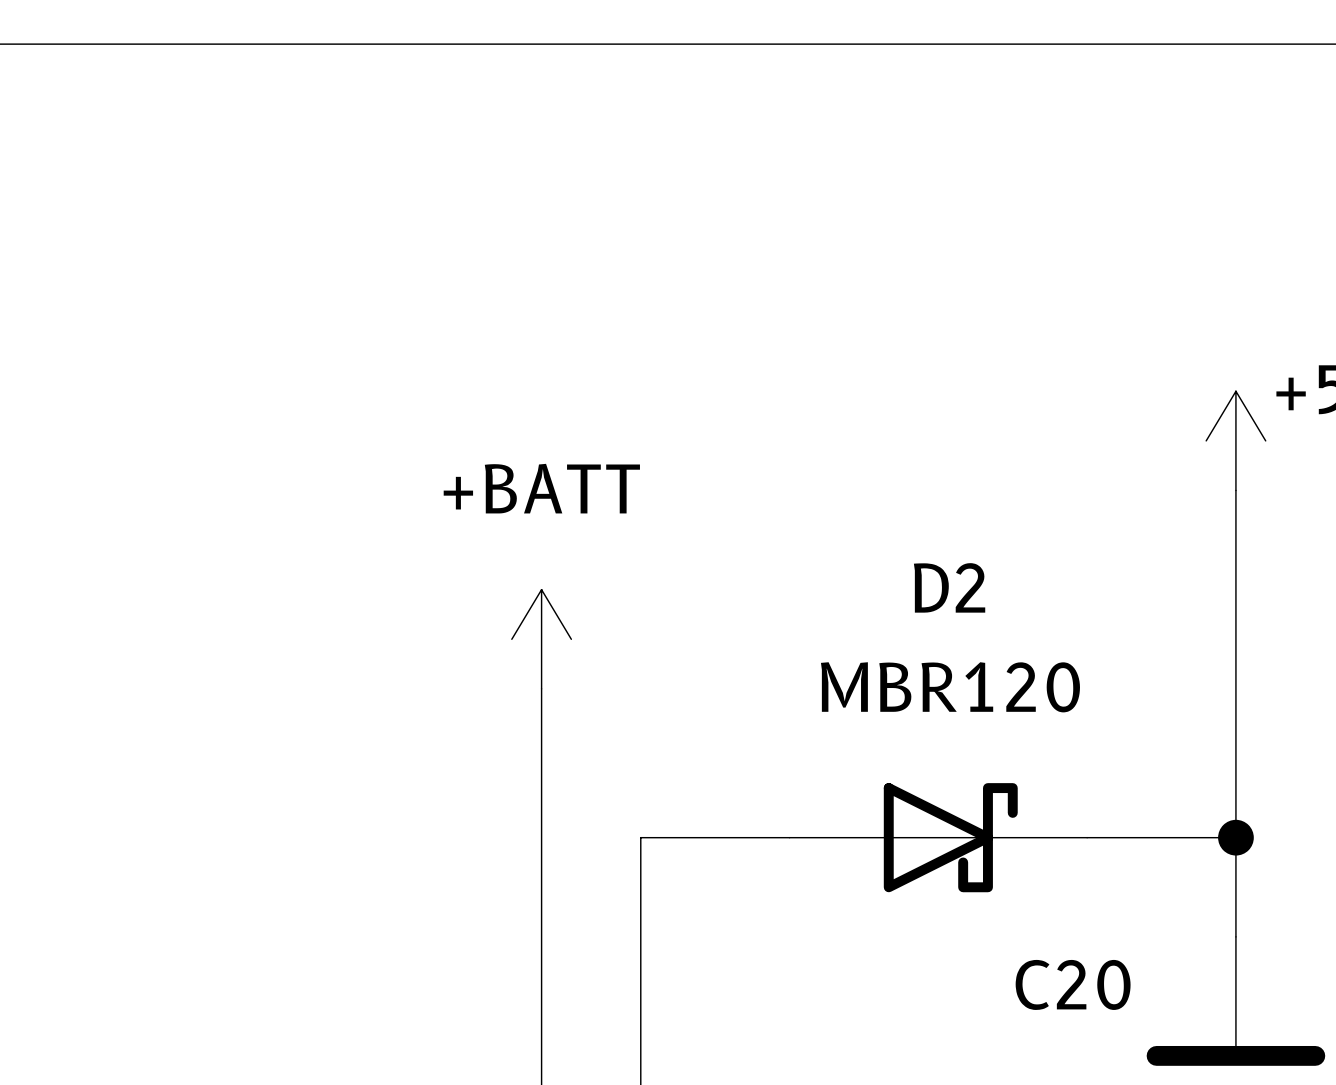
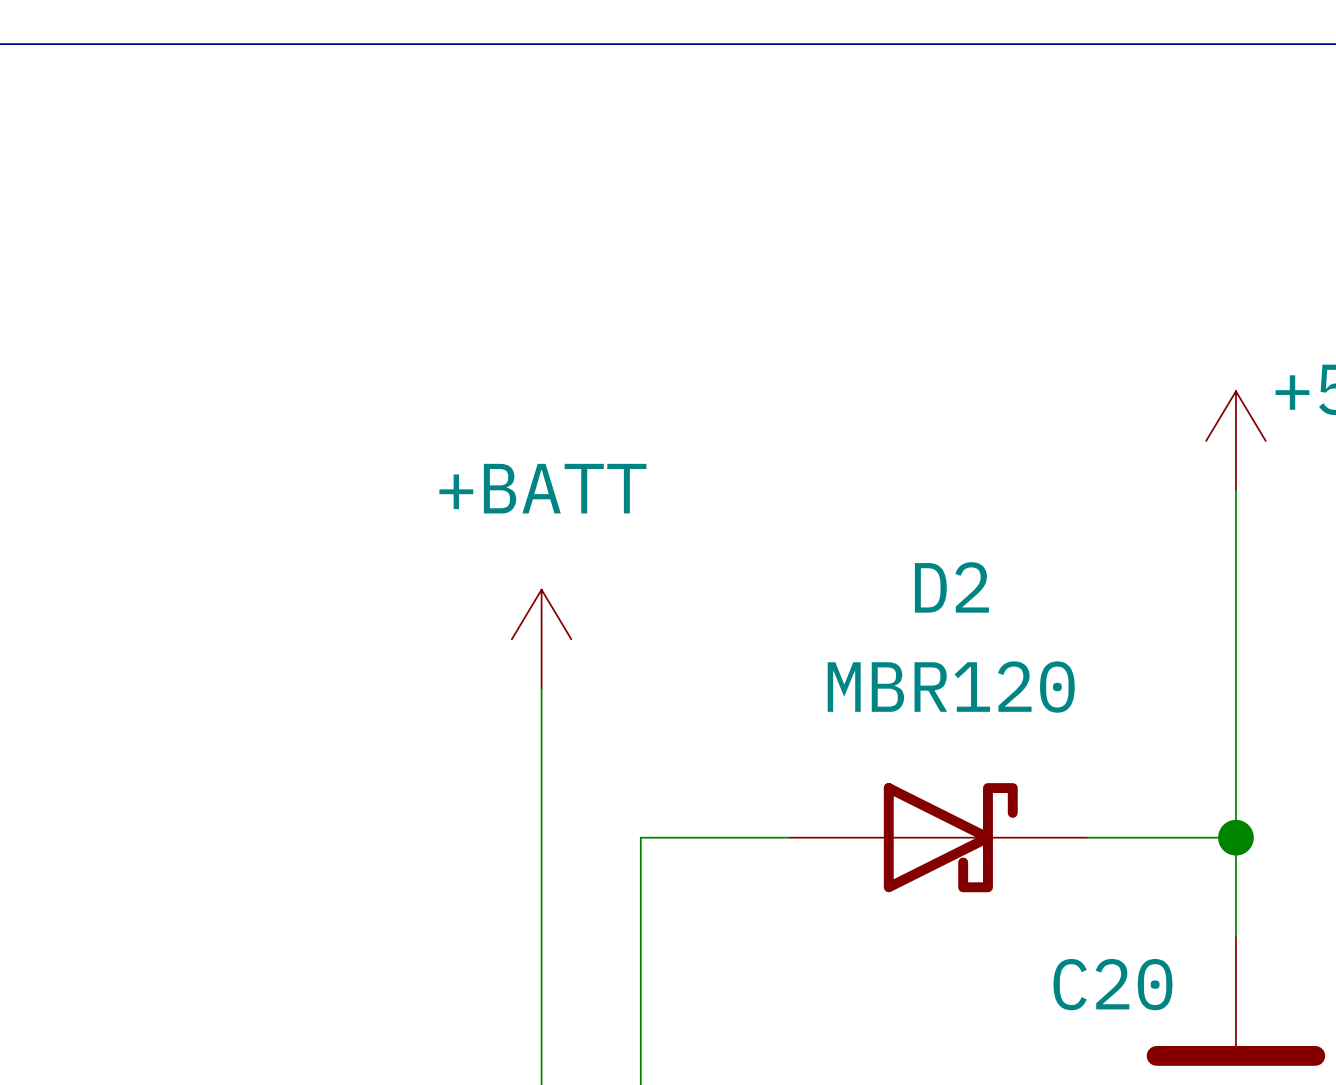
C20 name position: C20 (1073, 984) -> C20 (1112, 984)

